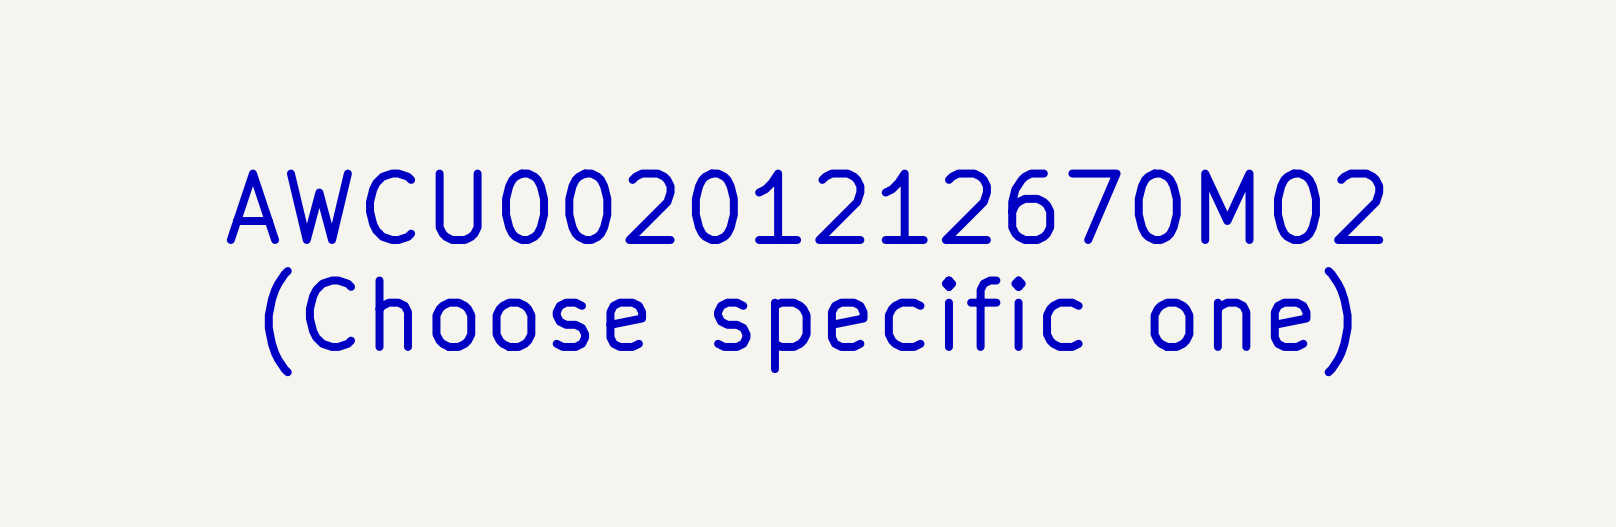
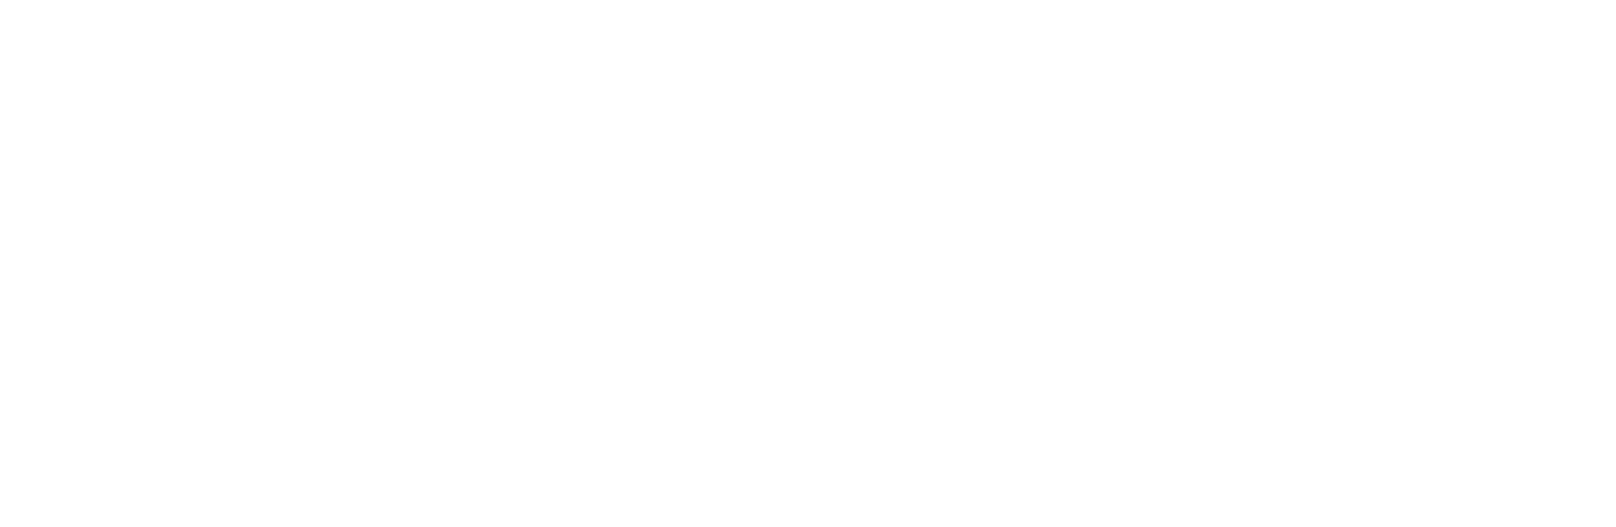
text: AWCU00201212670M02 (805, 206) -> none
text: (Choose specific one) (808, 321) -> none

